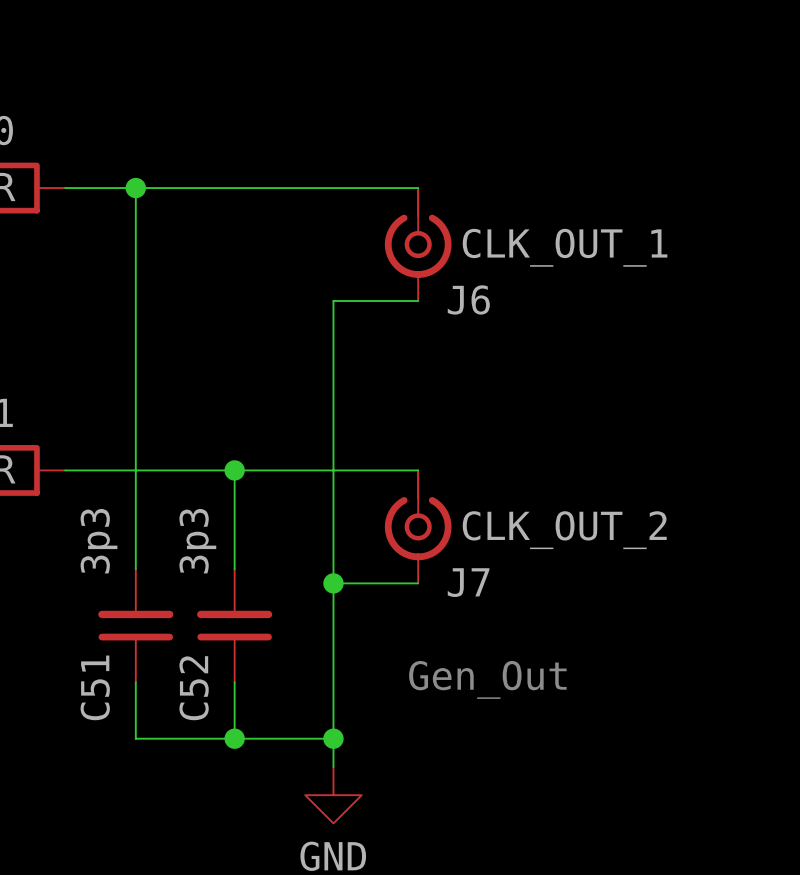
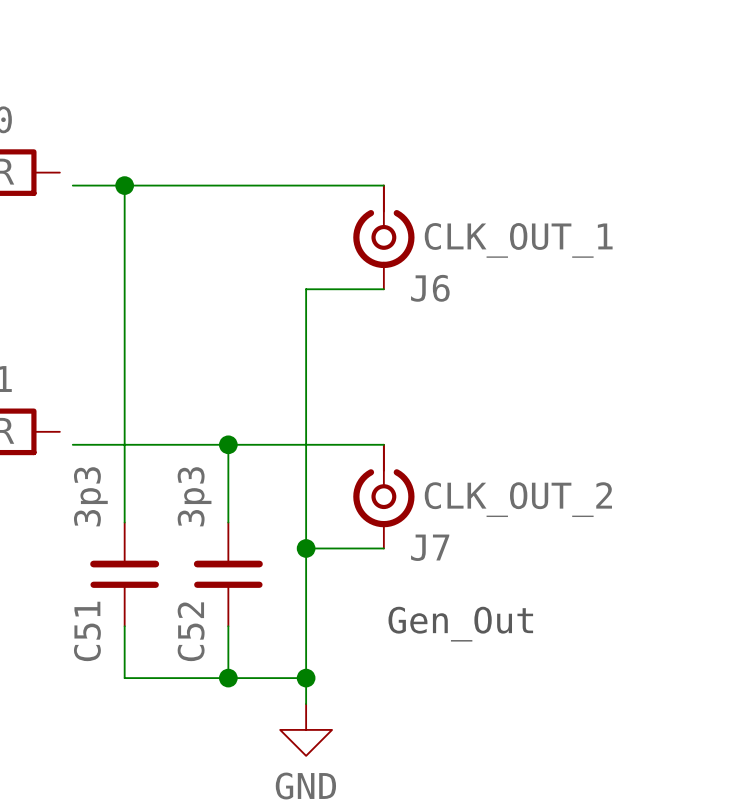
wire: (65, 188) (418, 188) -> none
junction position: (135, 188) -> (124, 185)
wire: none -> (72, 185) (383, 185)
J6 position: (418, 244) -> (383, 237)
wire: (418, 301) (333, 301) (333, 315) -> (383, 289) (306, 289)
wire: (65, 470) (418, 470) -> none
wire: (234, 470) (234, 569) -> none
junction position: (234, 470) -> (228, 444)
wire: none -> (72, 444) (383, 444)
wire: none -> (228, 444) (228, 522)
J7 position: (418, 526) -> (383, 496)
wire: (333, 583) (418, 583) -> (306, 548) (383, 548)
junction position: (333, 583) -> (306, 548)
C52 position: (234, 625) -> (228, 574)
text position: Gen_Out (487, 679) -> Gen_Out (460, 624)
wire: (234, 682) (234, 738) -> (228, 626) (228, 678)
junction position: (234, 738) -> (228, 678)

